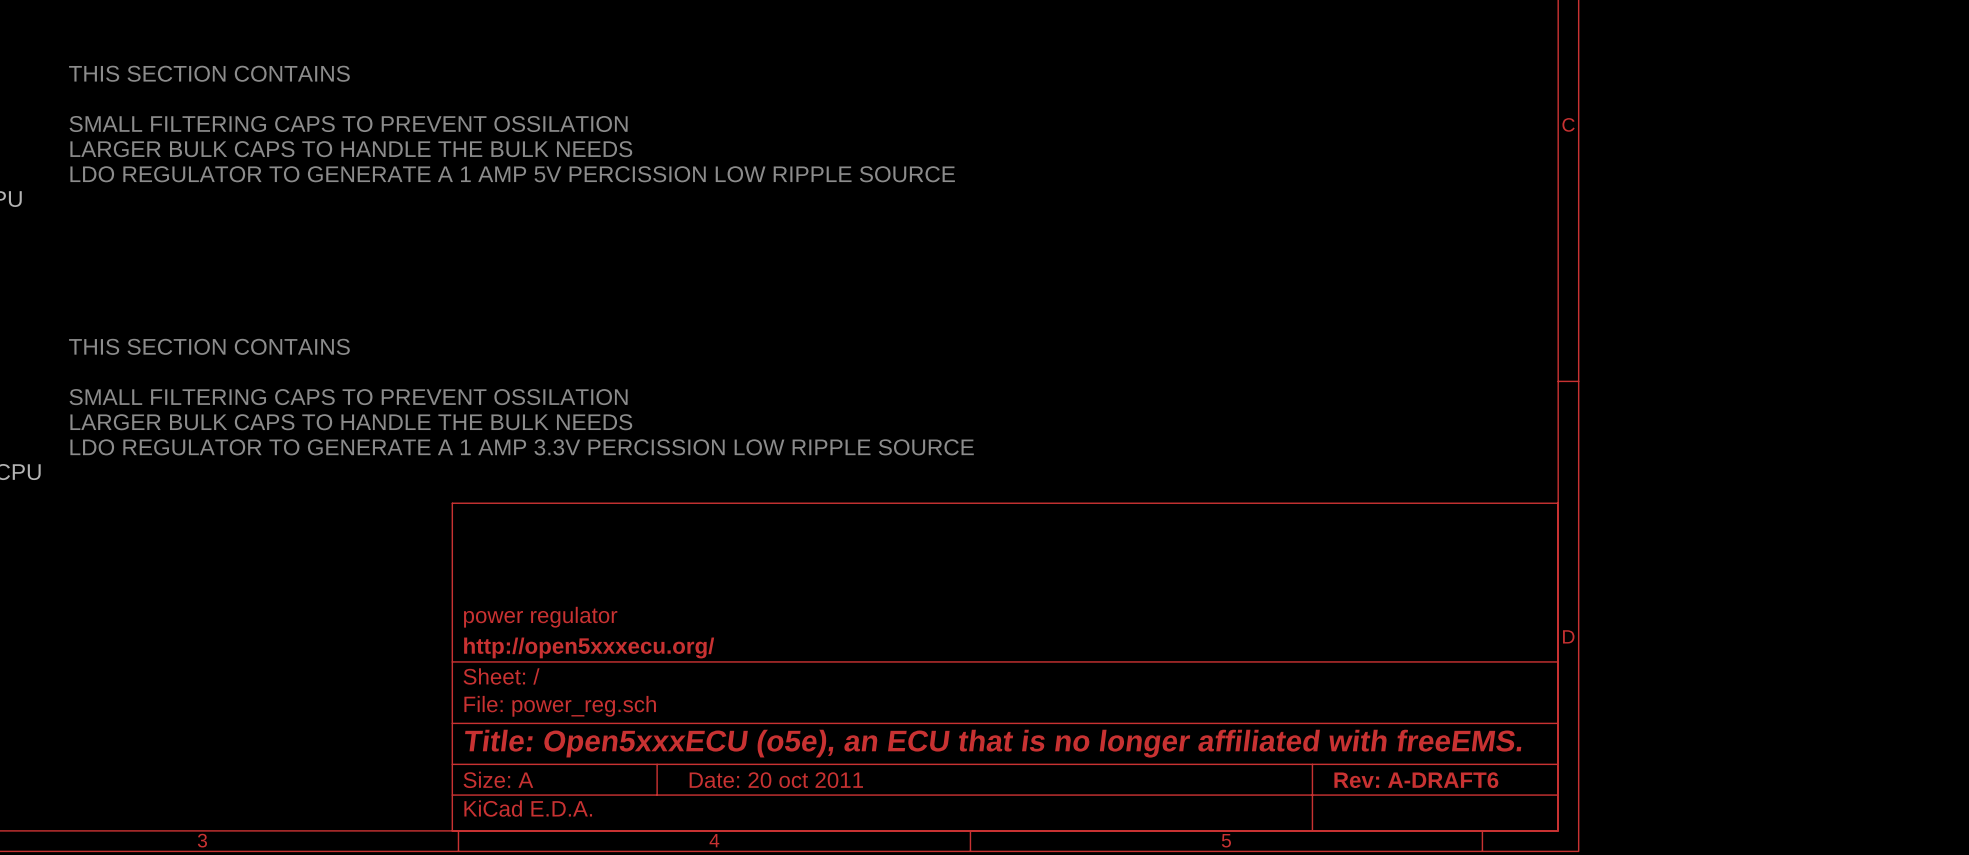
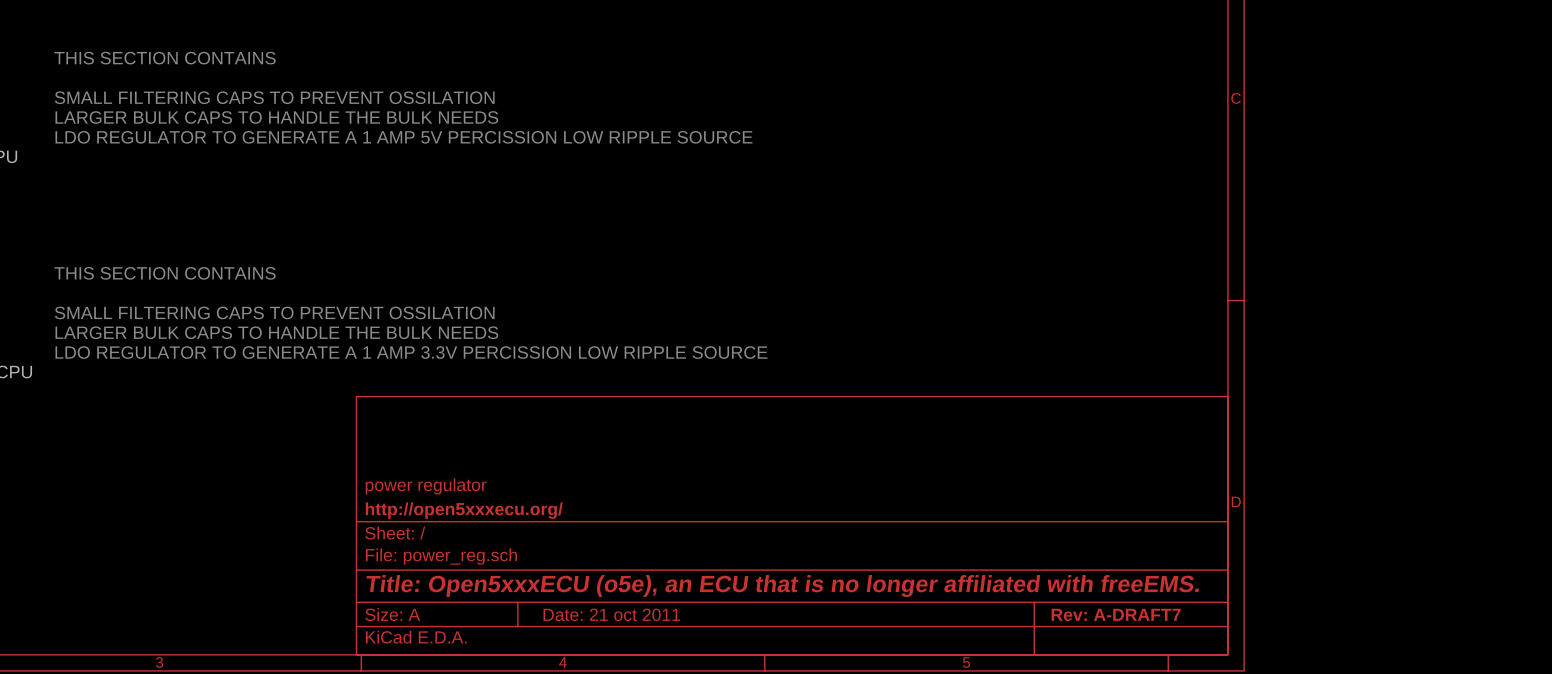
title block: Date: 20 oct 2011 (776, 780) -> Date: 21 oct 2011 (611, 614)
title block: Rev: A-DRAFT6 (1416, 780) -> Rev: A-DRAFT7 (1116, 614)

